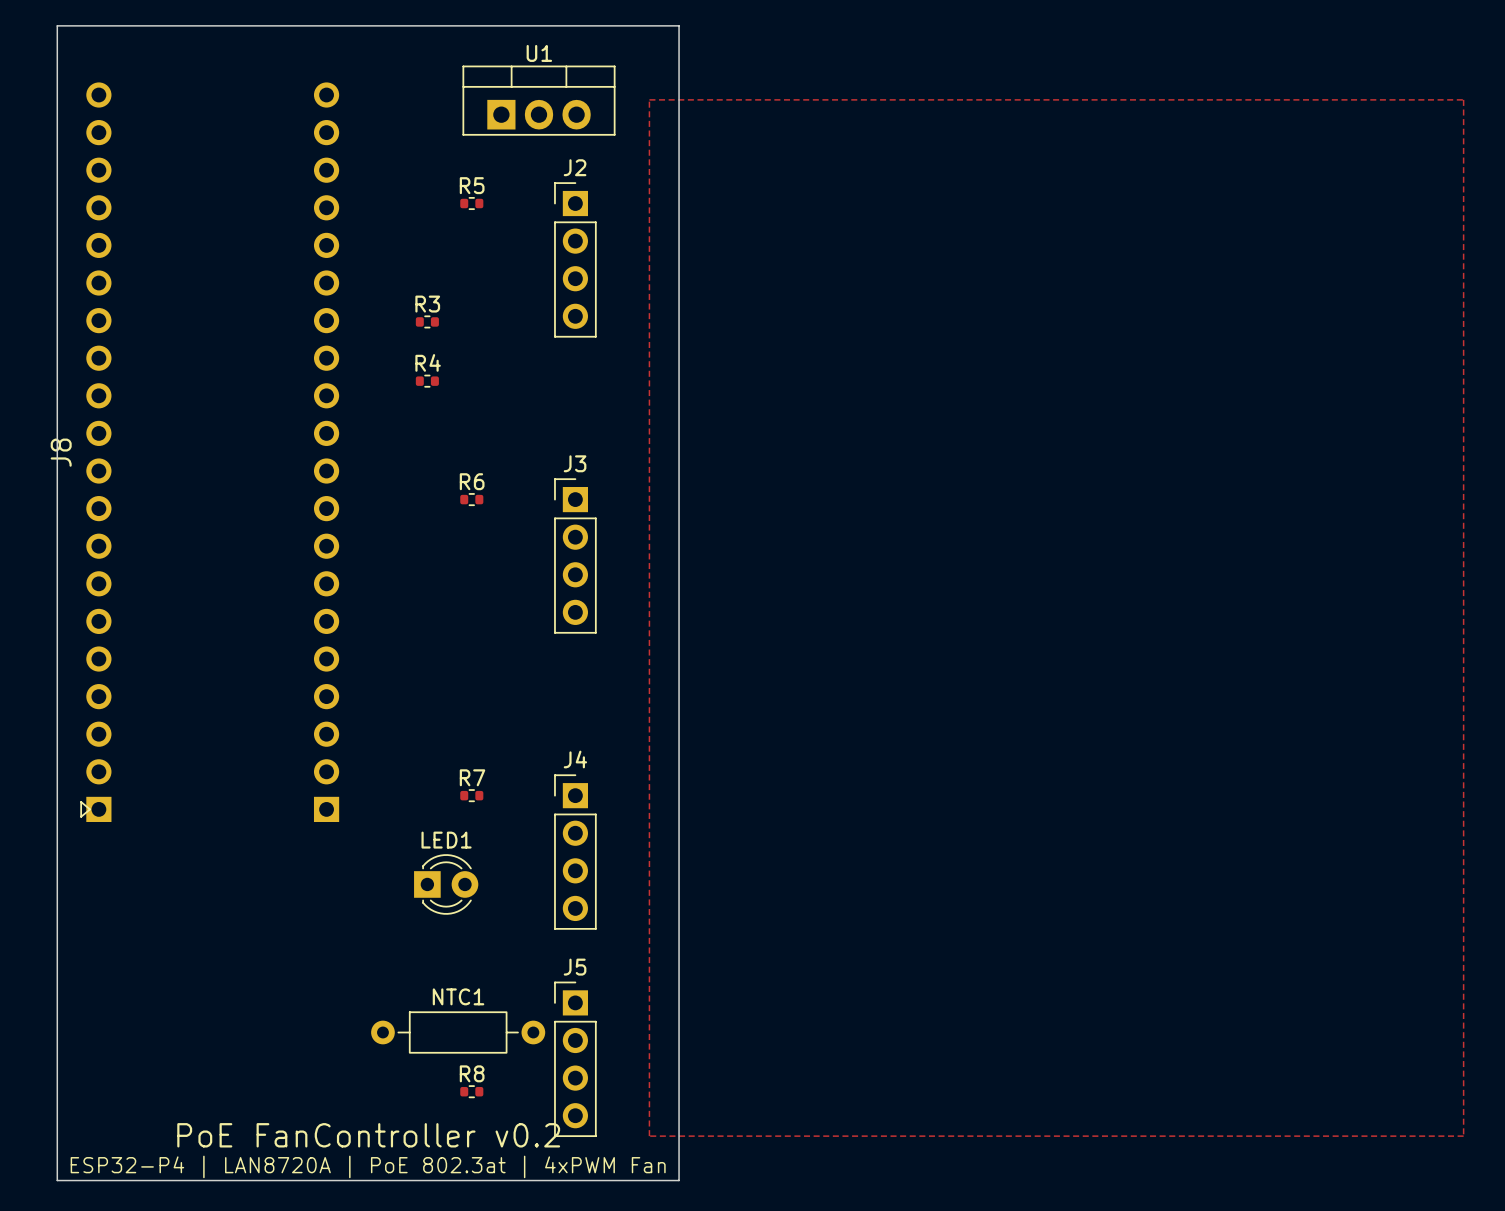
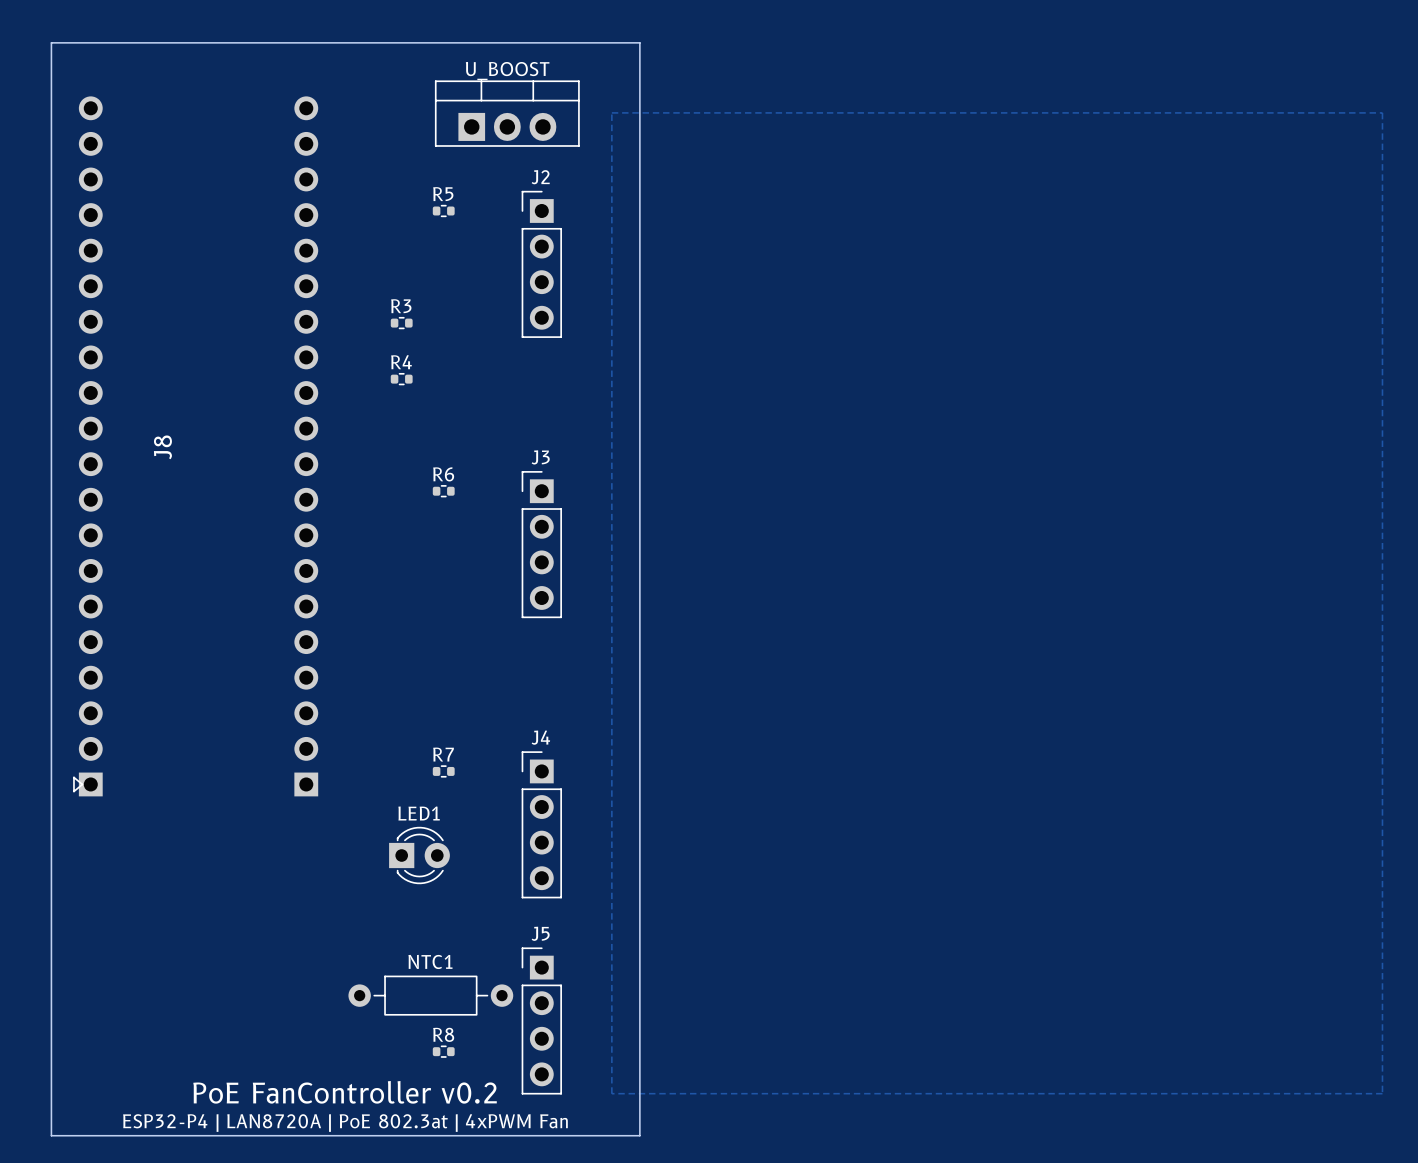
U1 name: U1 (539, 53) -> U_BOOST (507, 71)
J8 name position: J8 (61, 452) -> J8 (162, 447)

